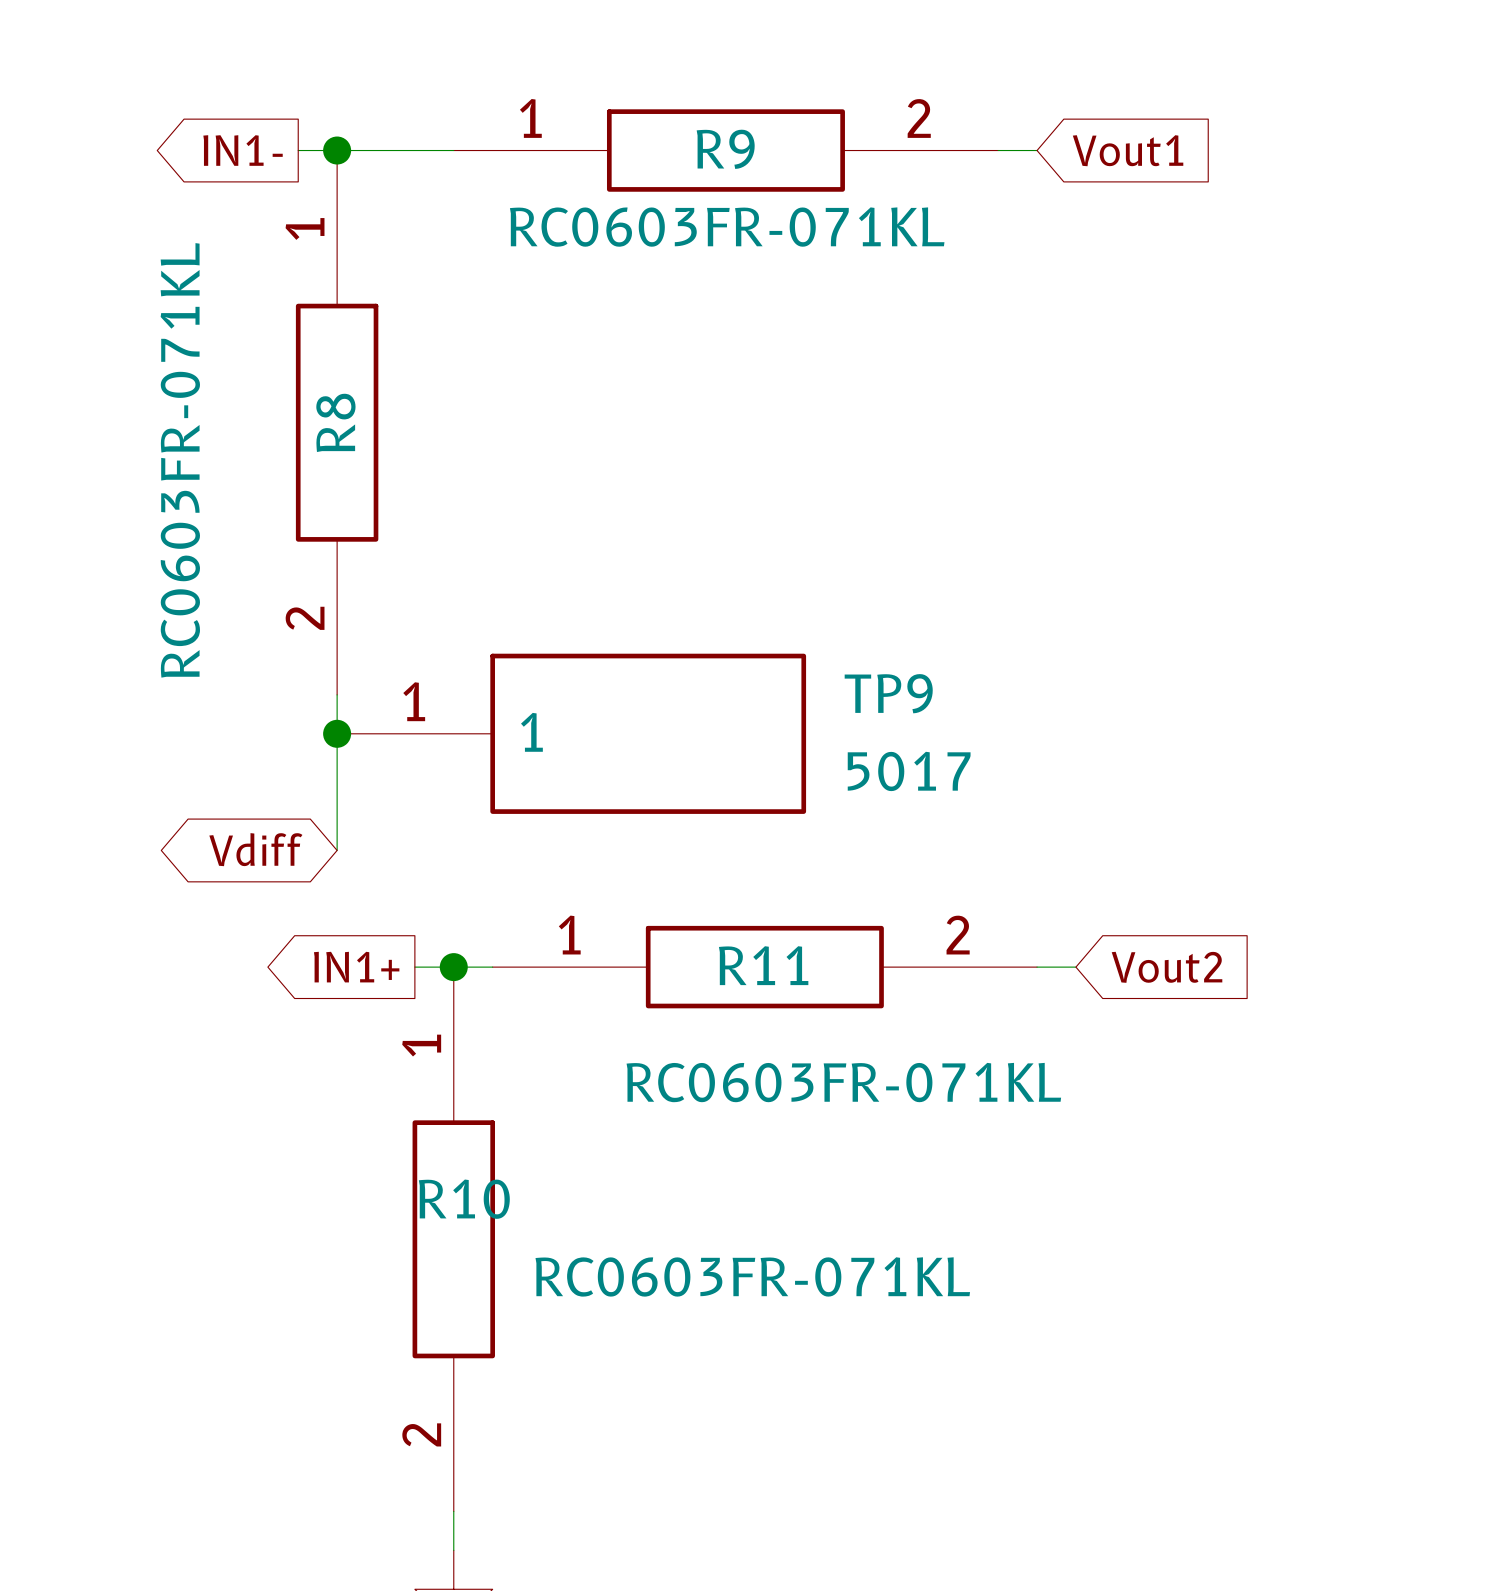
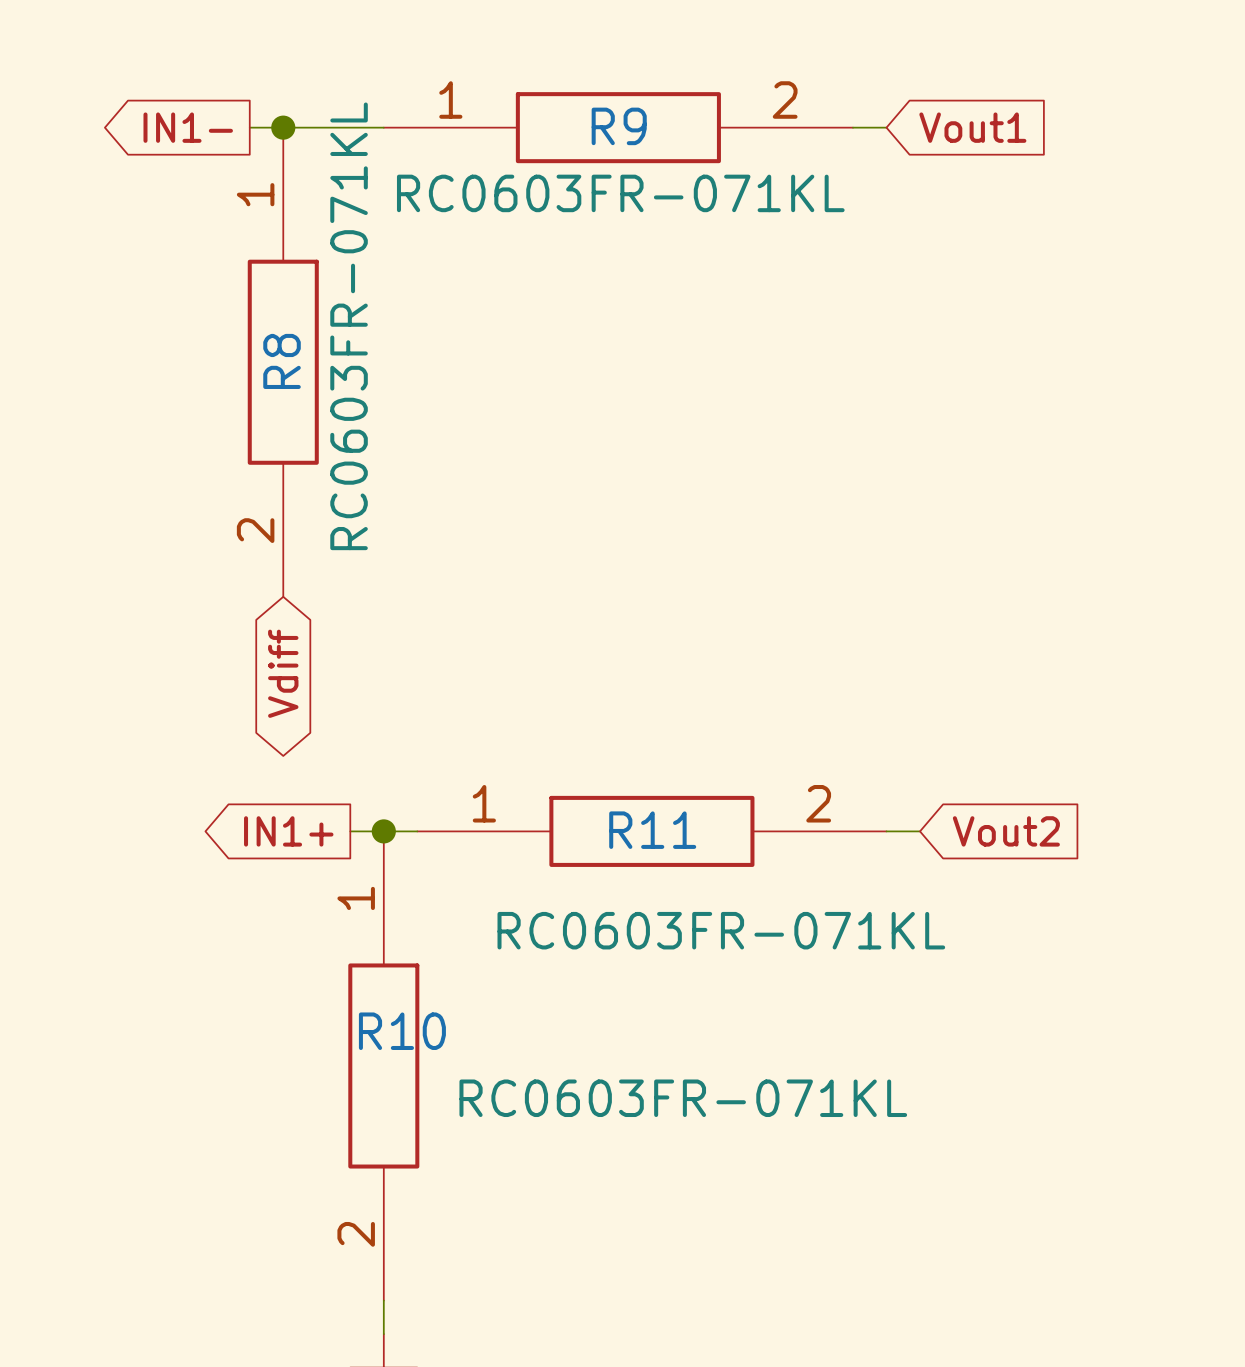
R8 value position: RC0603FR-071KL (180, 460) -> RC0603FR-071KL (349, 326)
wire: (337, 694) (337, 850) -> none
junction: (337, 733) -> none
TP9: 5017 (571, 733) -> none
global label rotation: 0° (255, 849) -> 90° counterclockwise (283, 673)

